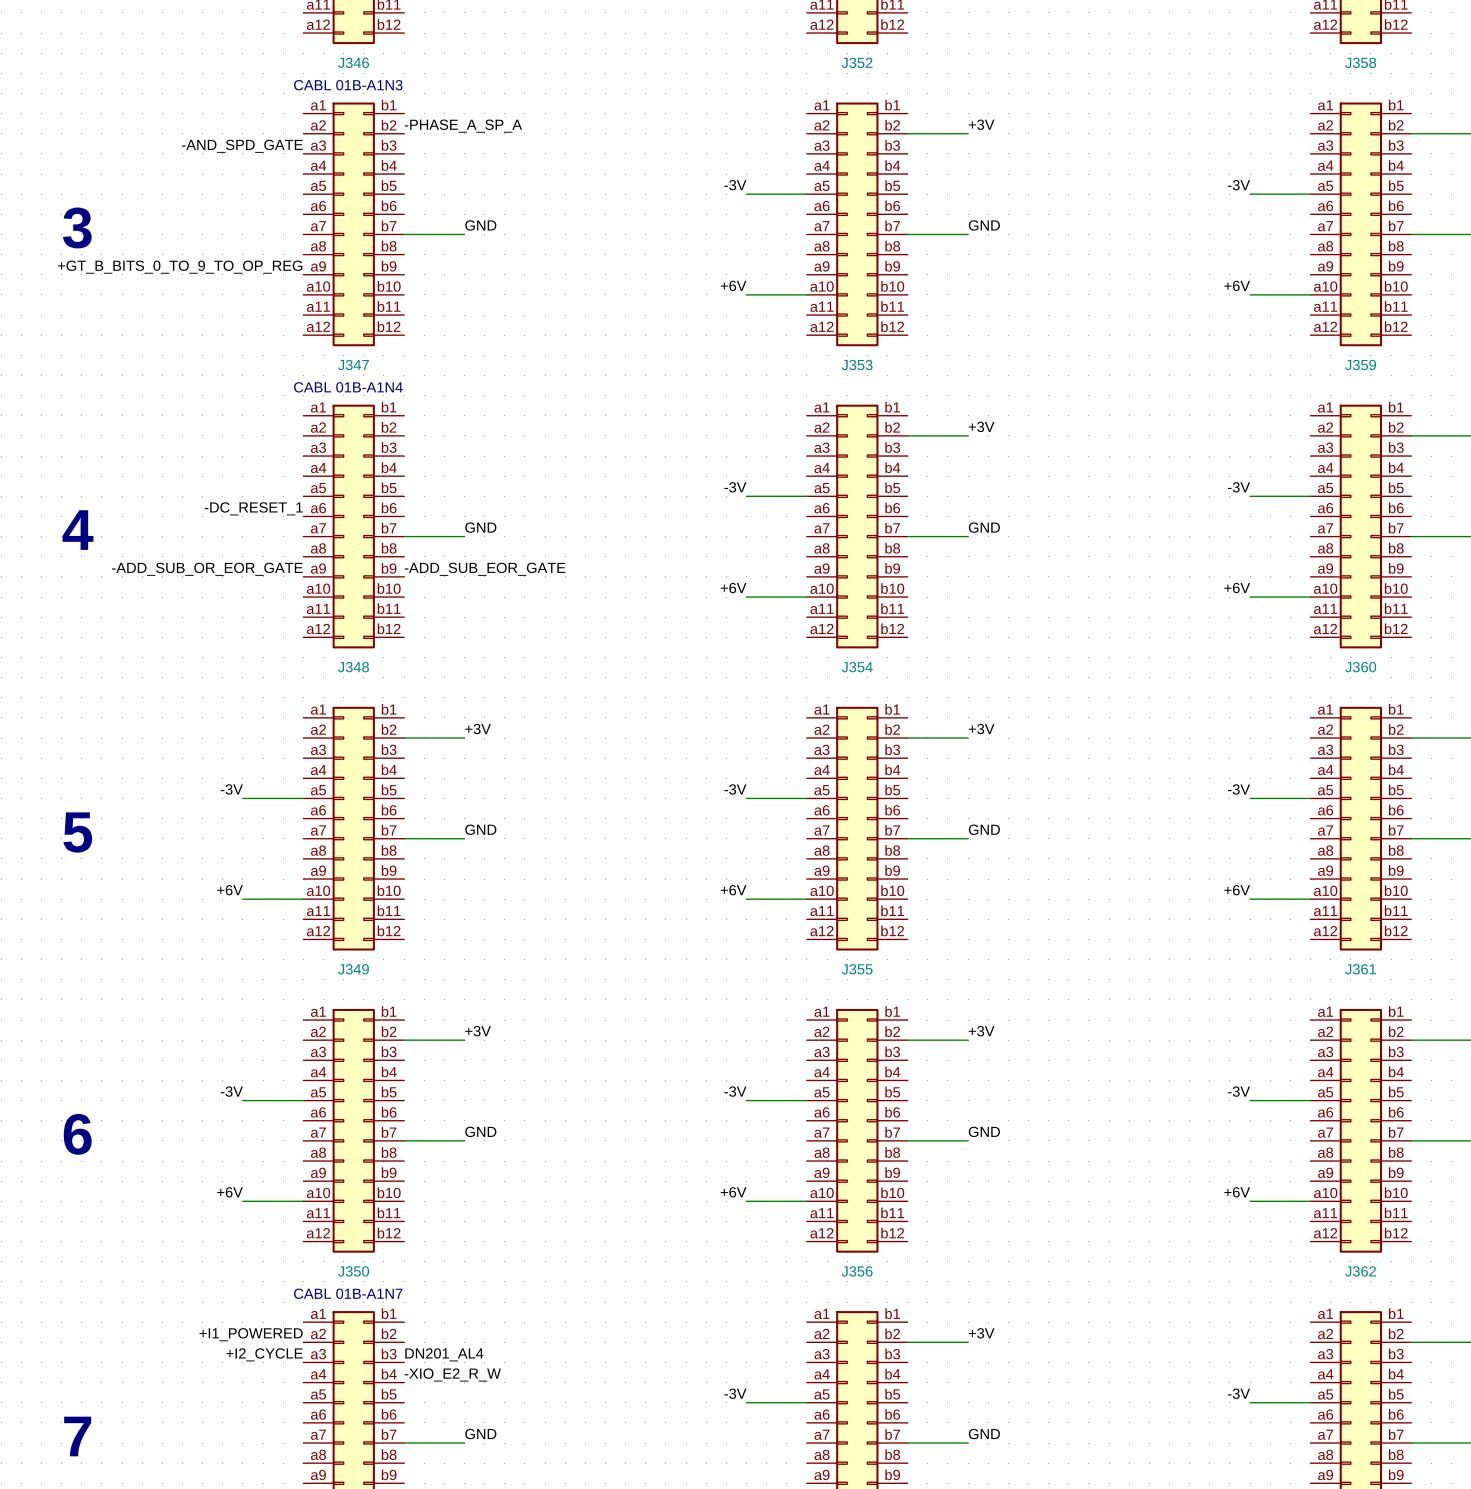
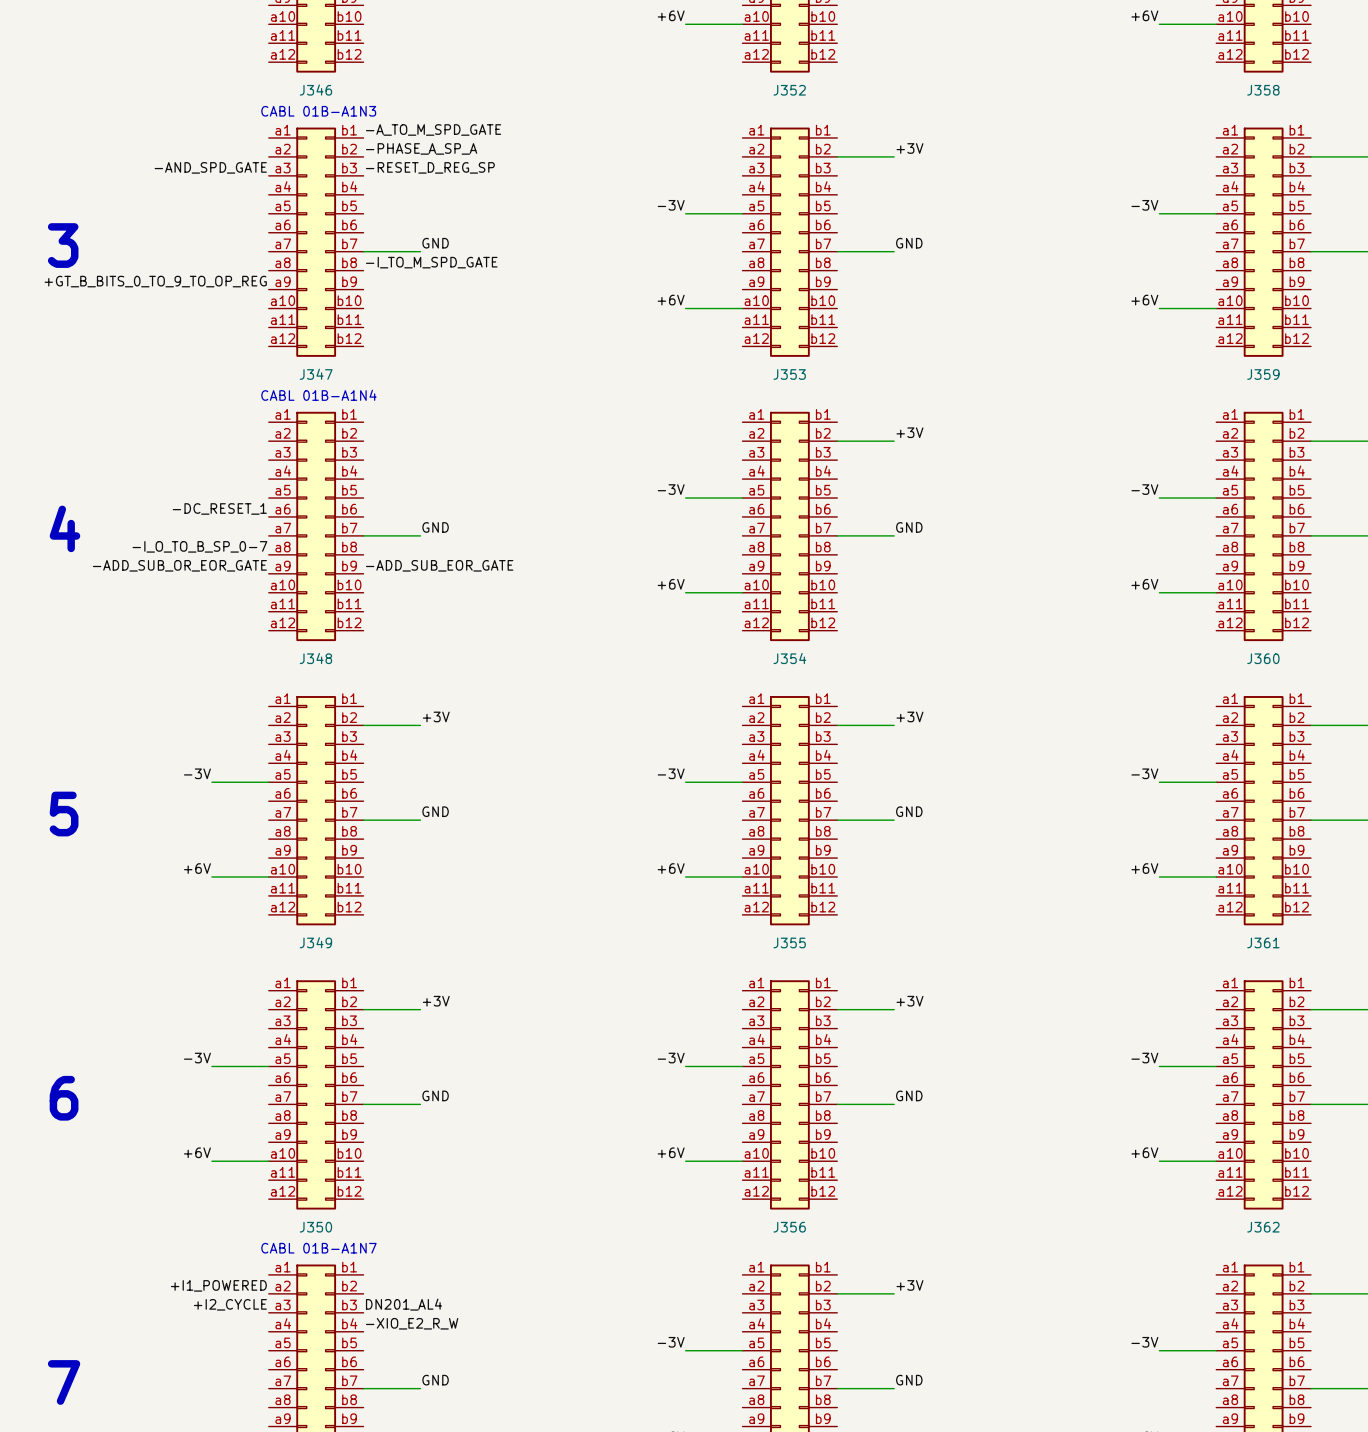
label: none -> -A_TO_M_SPD_GATE (433, 129)
label: none -> -RESET_D_REG_SP (430, 167)
label: none -> -I_TO_M_SPD_GATE (431, 262)
label: none -> -I_O_TO_B_SP_0-7 (199, 546)

